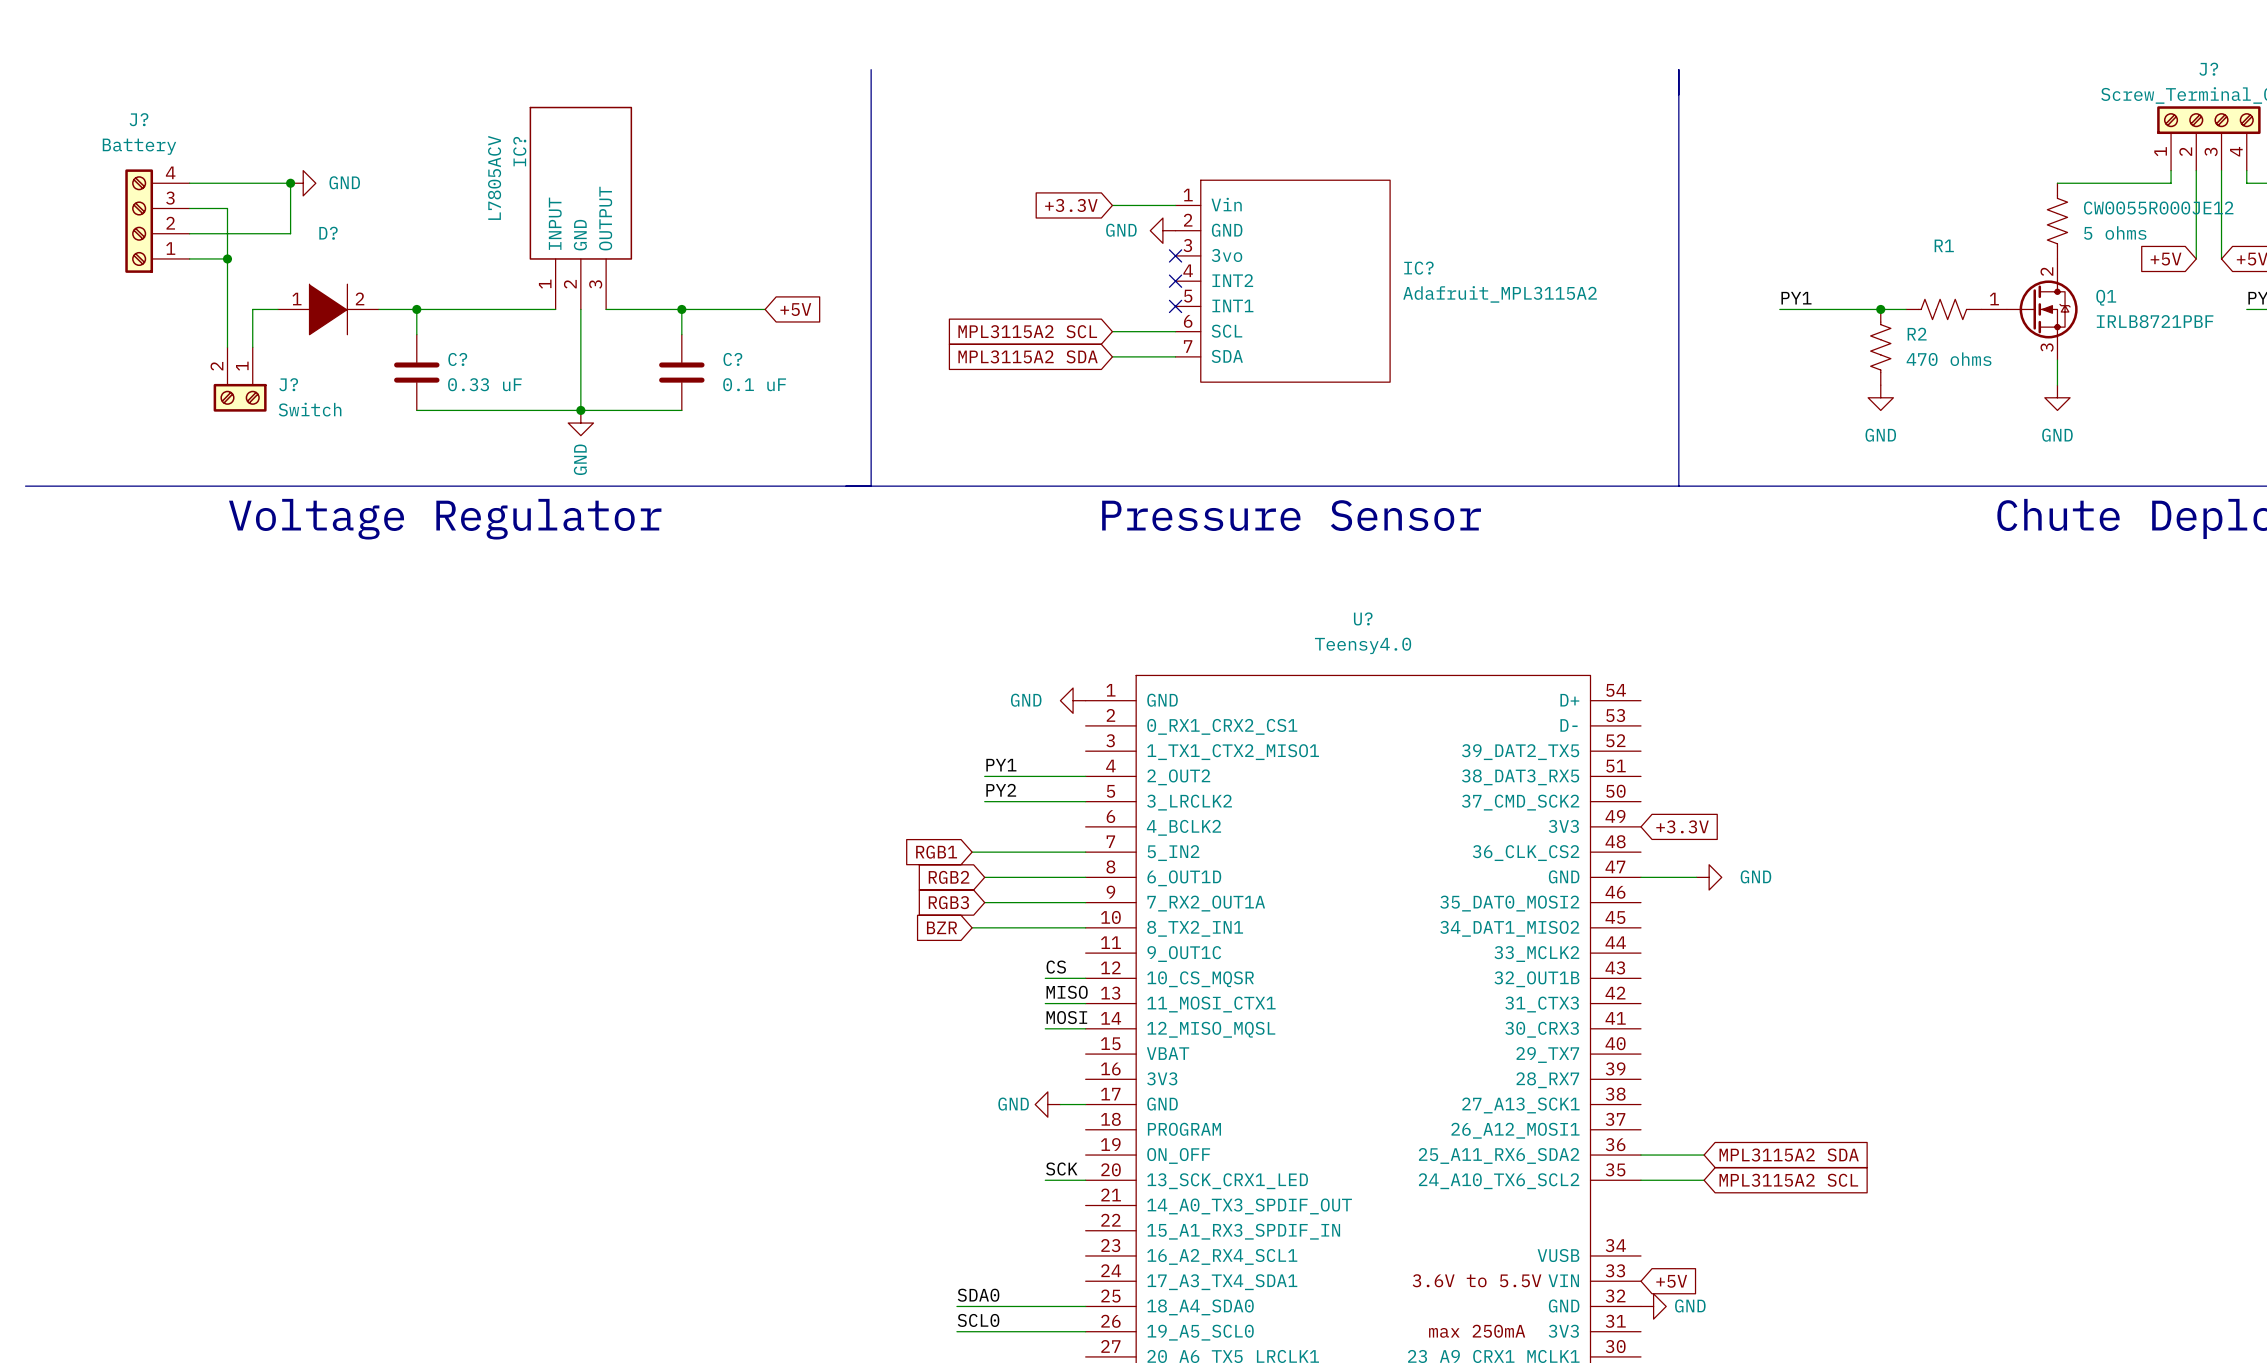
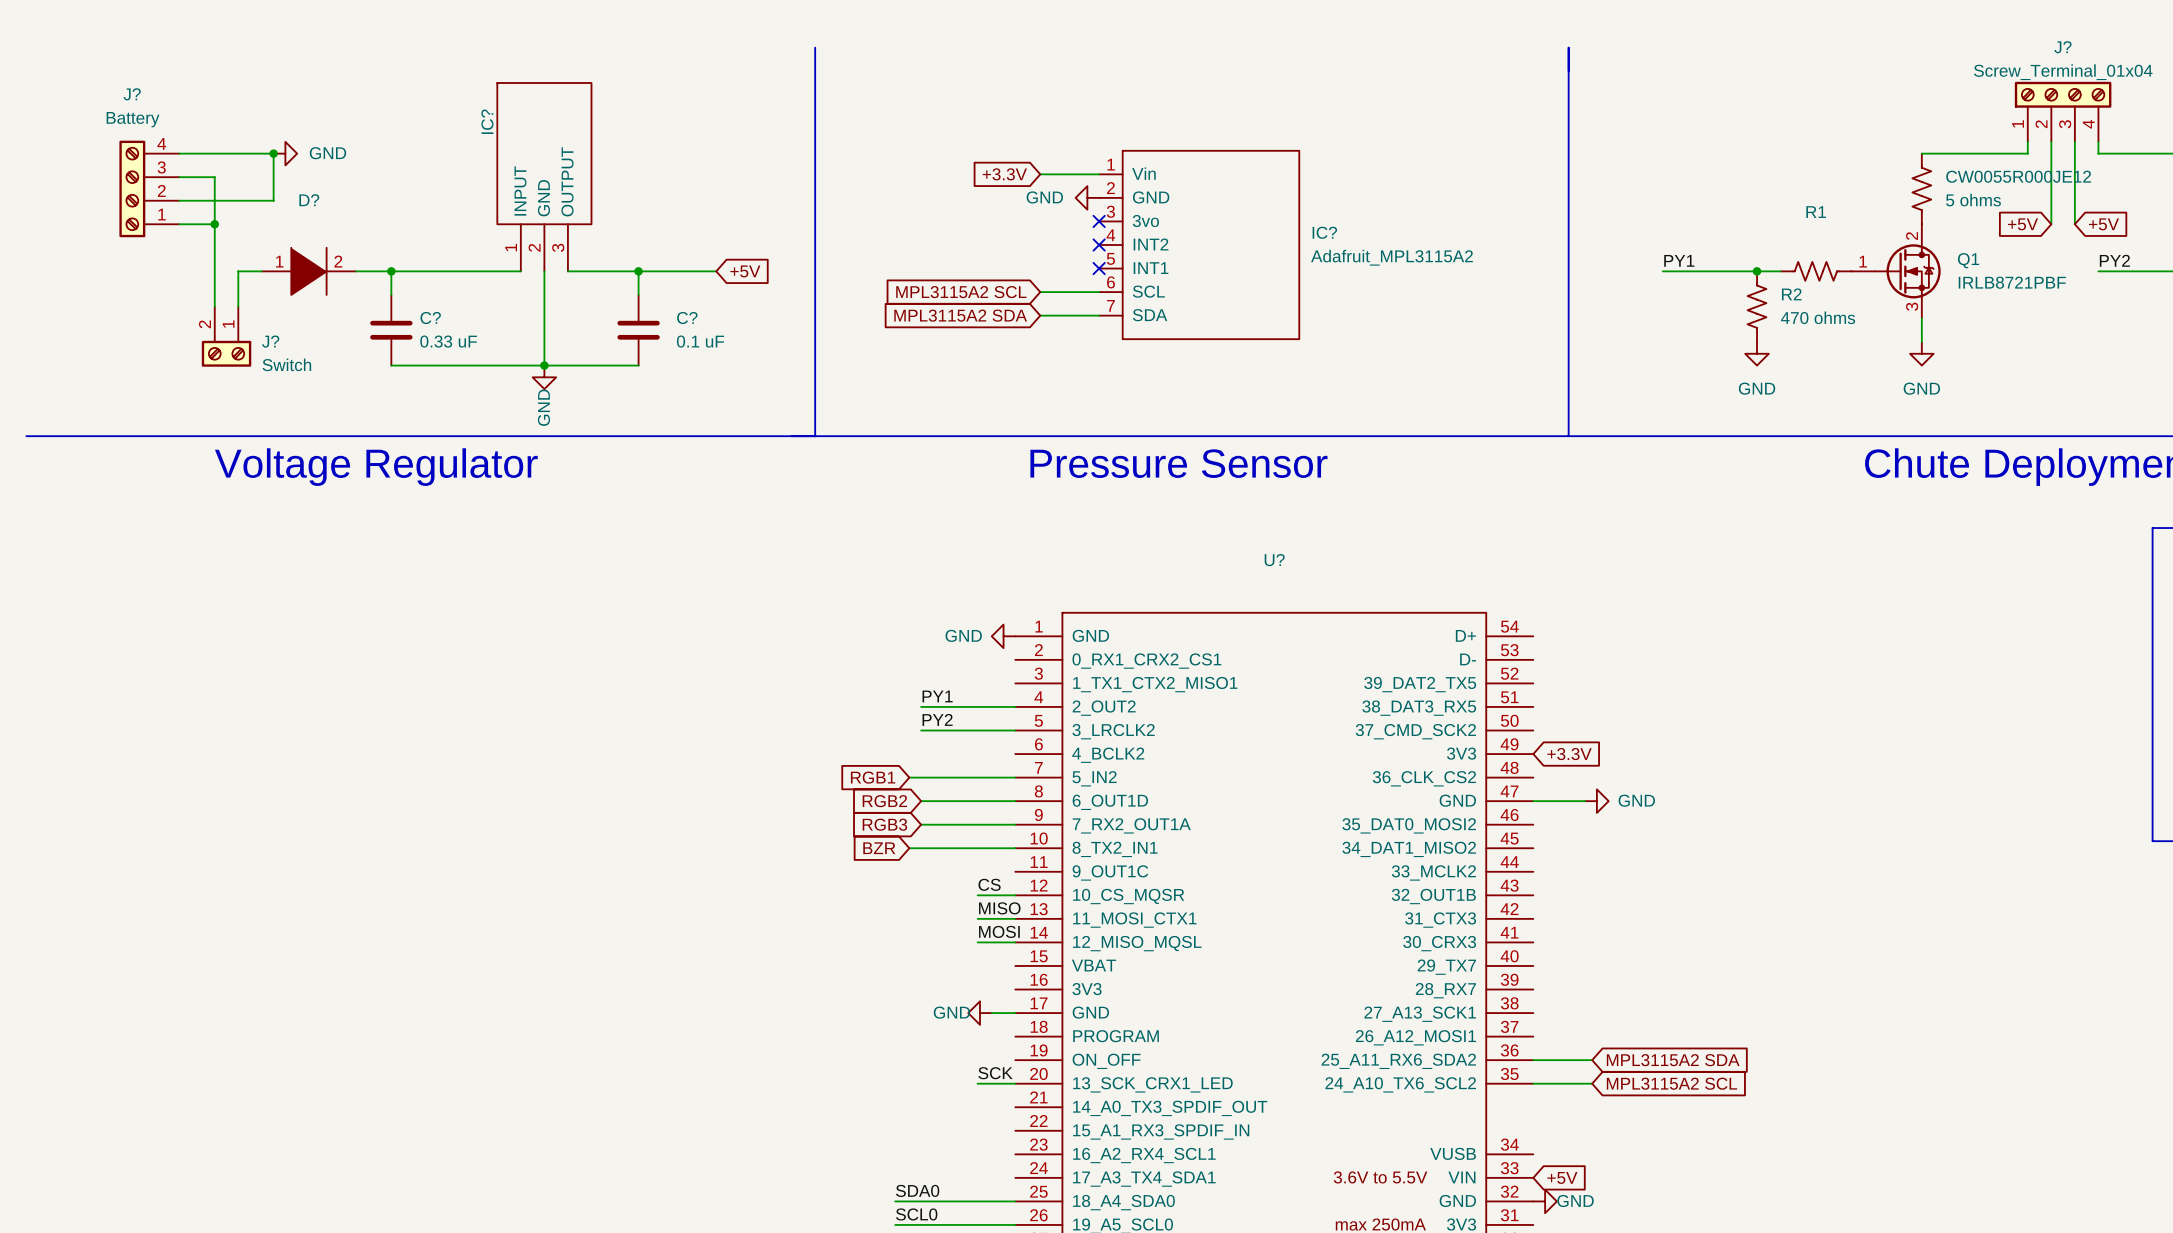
IC? value: L7805ACV (494, 177) -> none
U? value: Teensy4.0 (1363, 645) -> none

